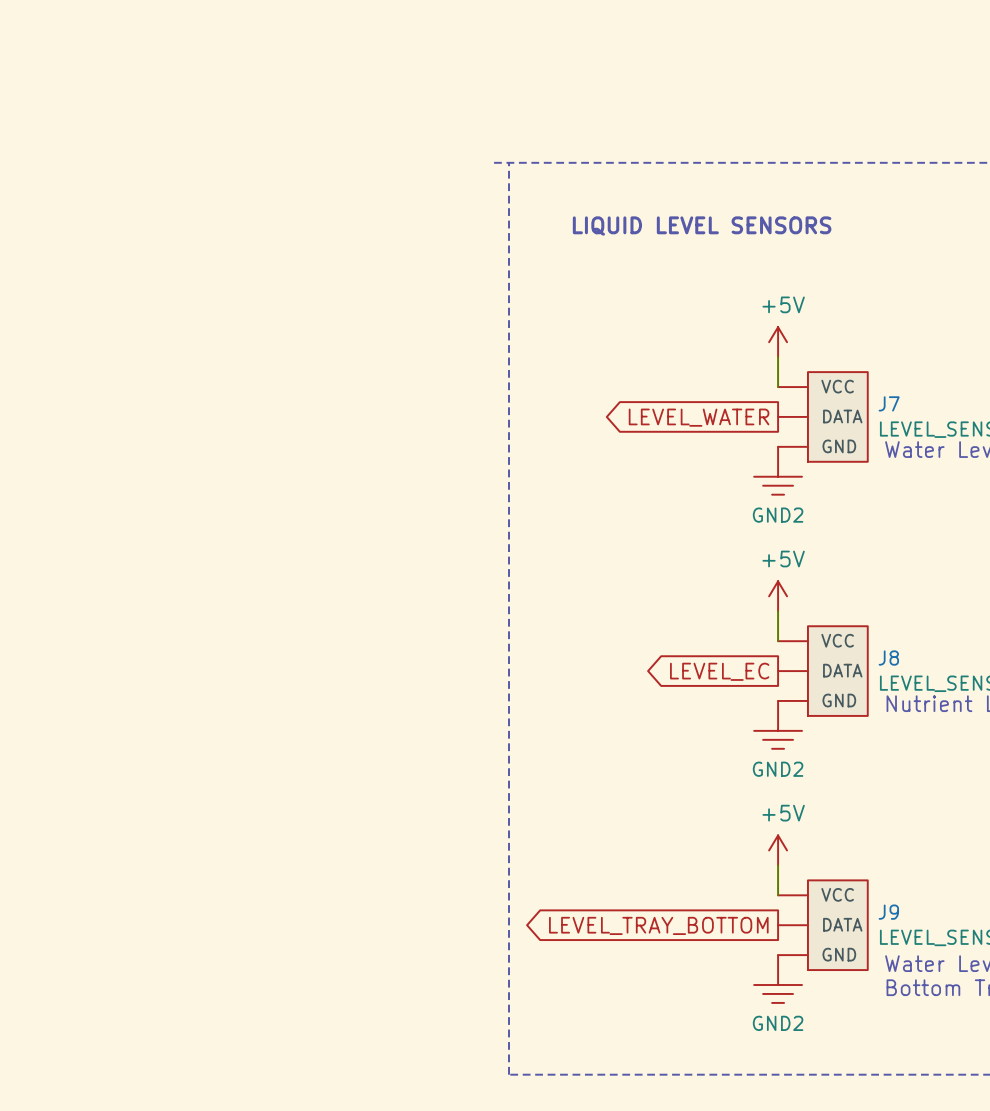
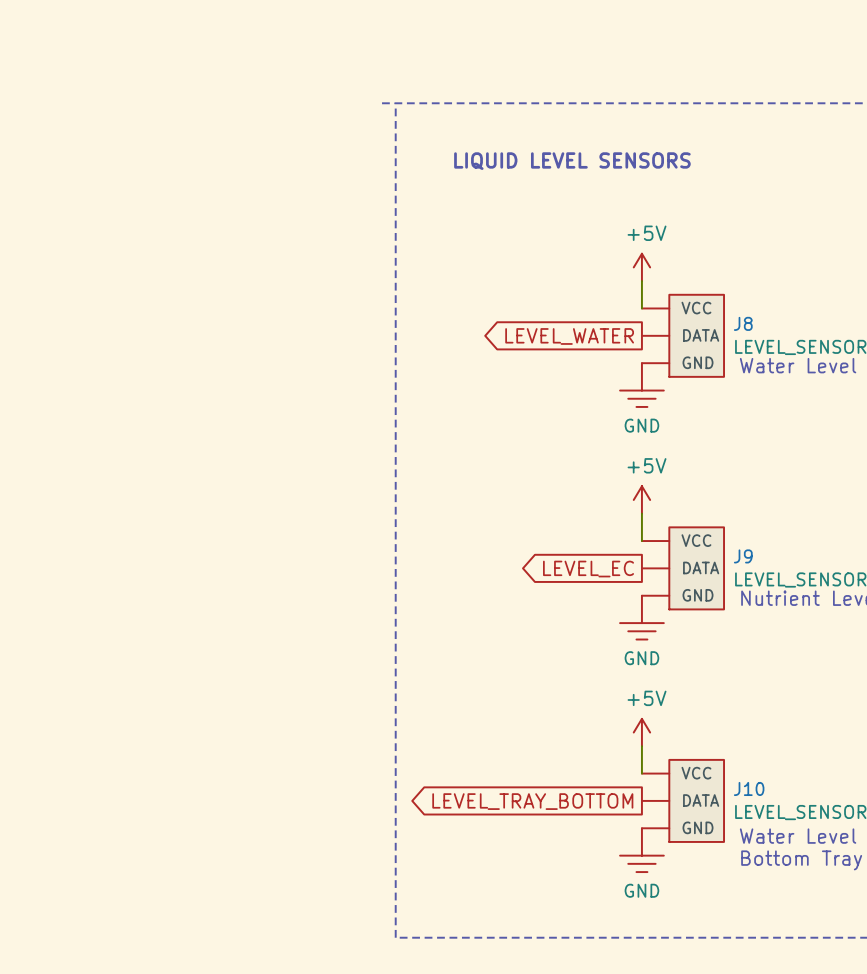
J7 name: J7 (889, 403) -> J8 (743, 323)
power symbol: GND2 (778, 470) -> GND (641, 385)
J8 name: J8 (888, 658) -> J9 (743, 556)
power symbol: GND2 (778, 724) -> GND (641, 617)
J9 name: J9 (888, 912) -> J10 (749, 788)
power symbol: GND2 (778, 979) -> GND (641, 850)

